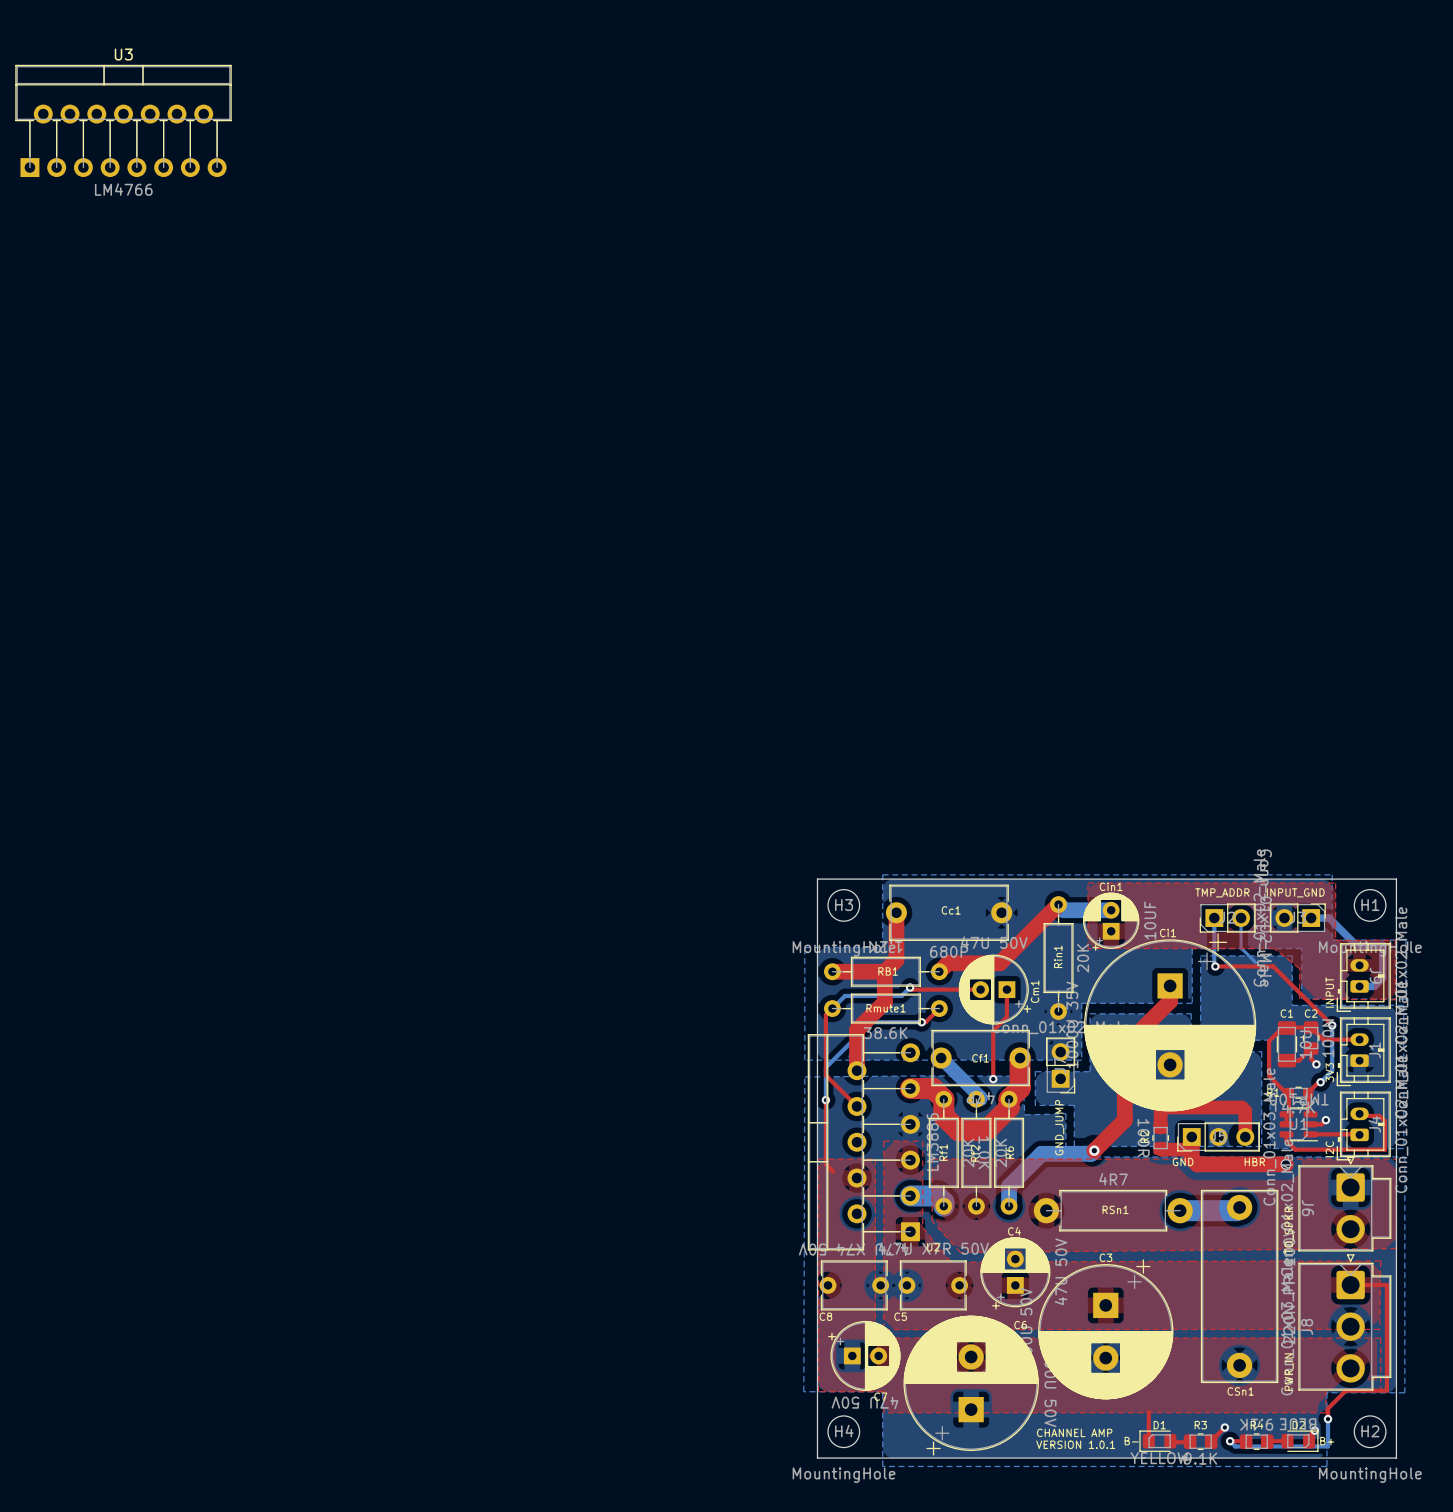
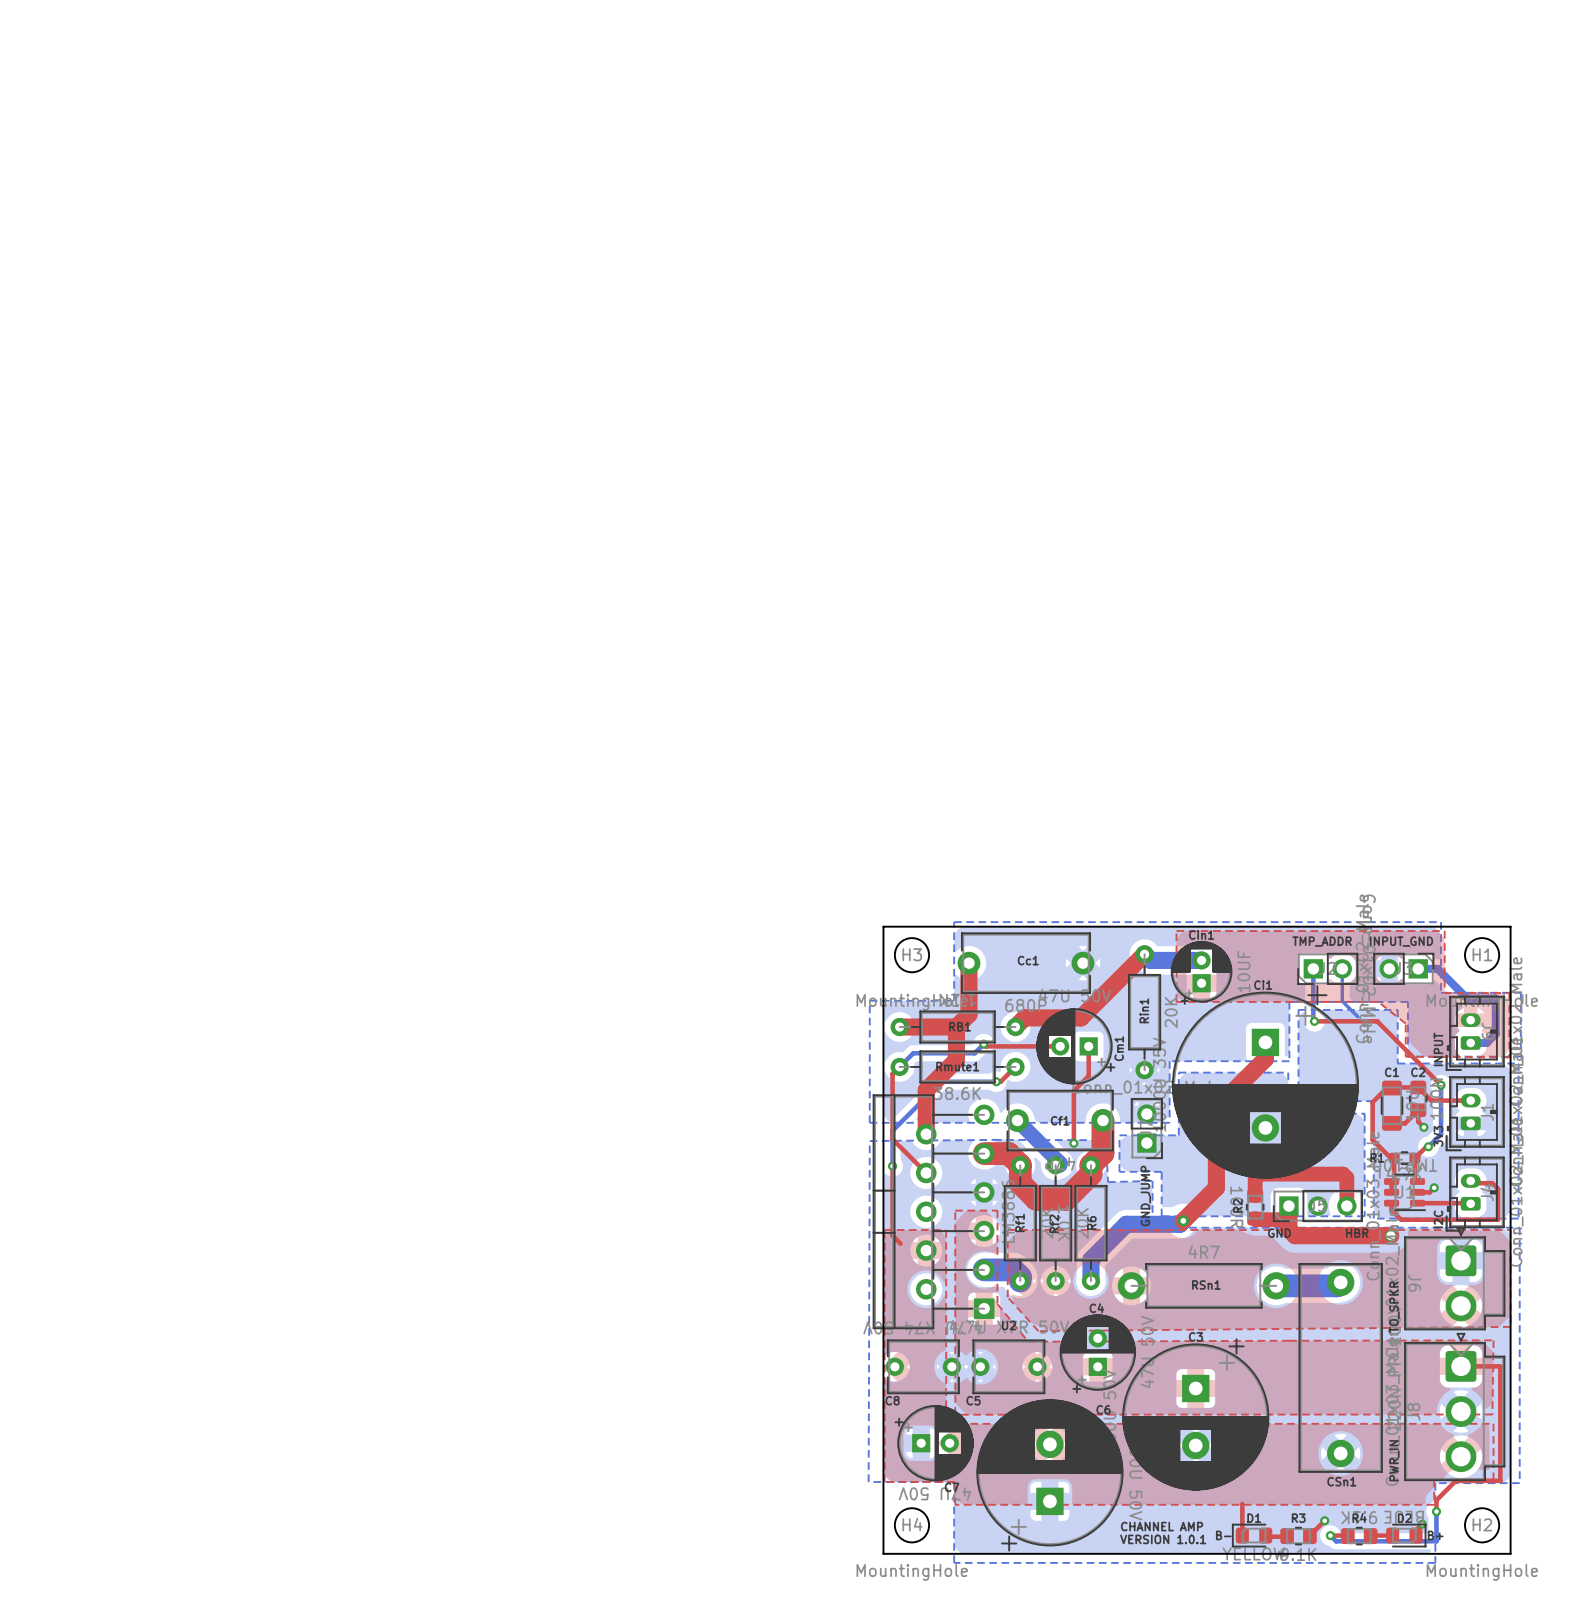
U3: LM4766 (123, 120) -> none

